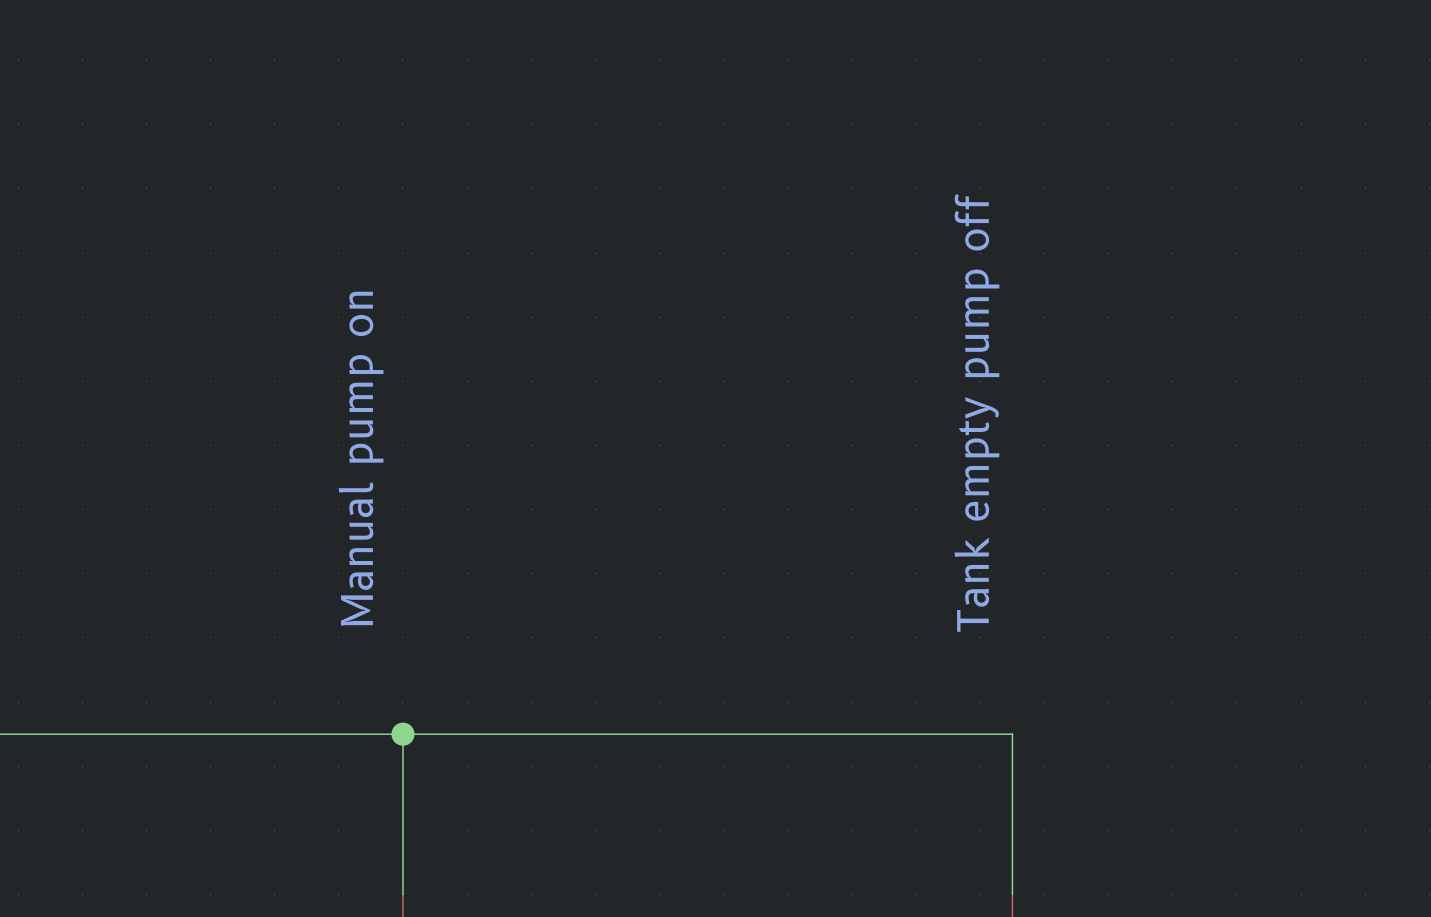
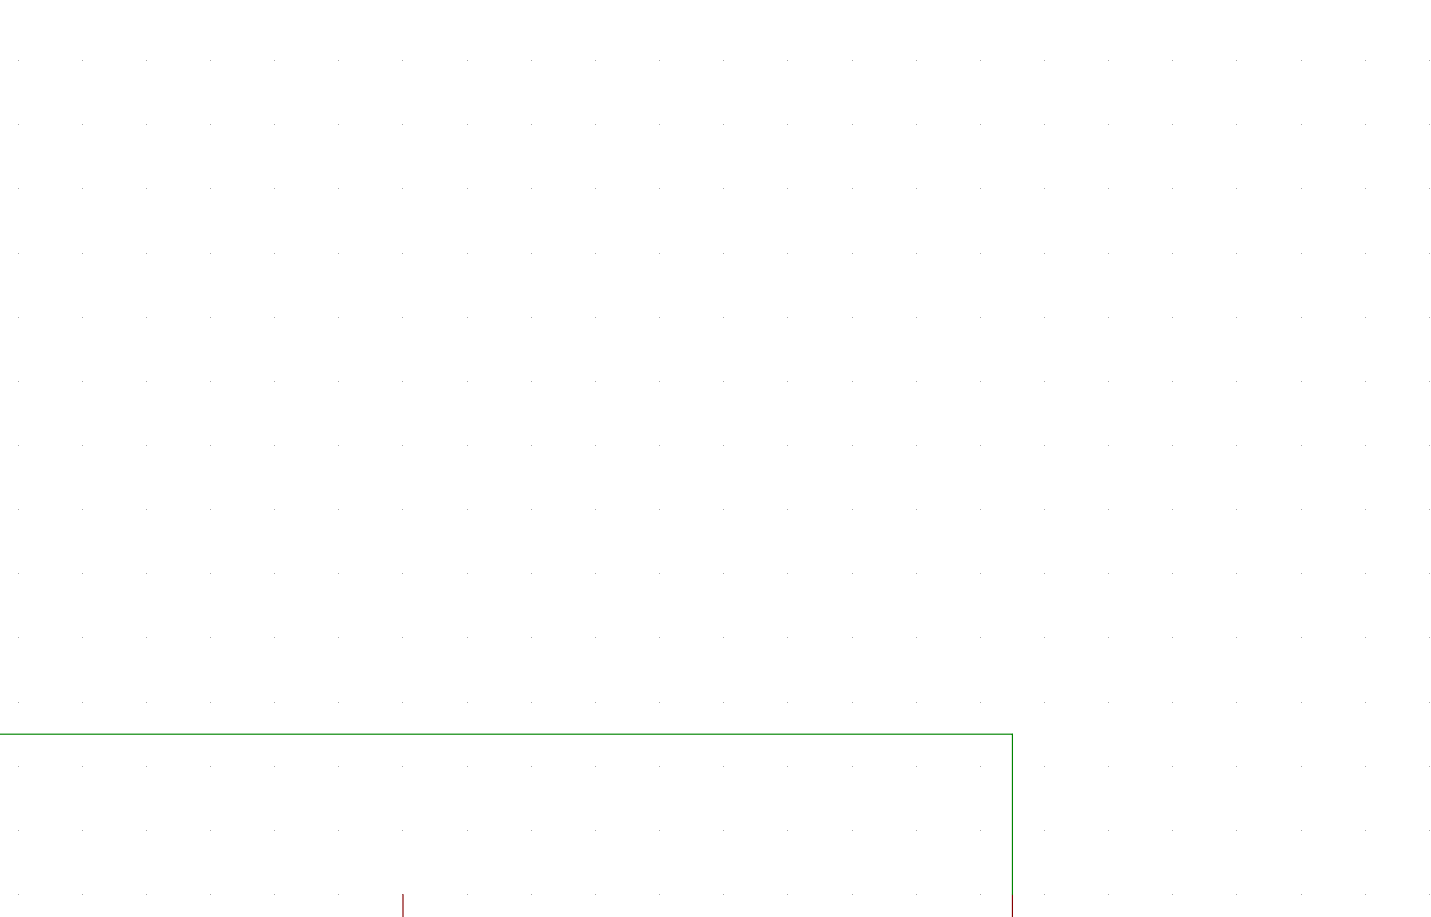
text: Tank empty pump off (976, 412) -> none
text: Manual pump on (361, 458) -> none
wire: (402, 734) (402, 894) -> none
junction: (402, 734) -> none

